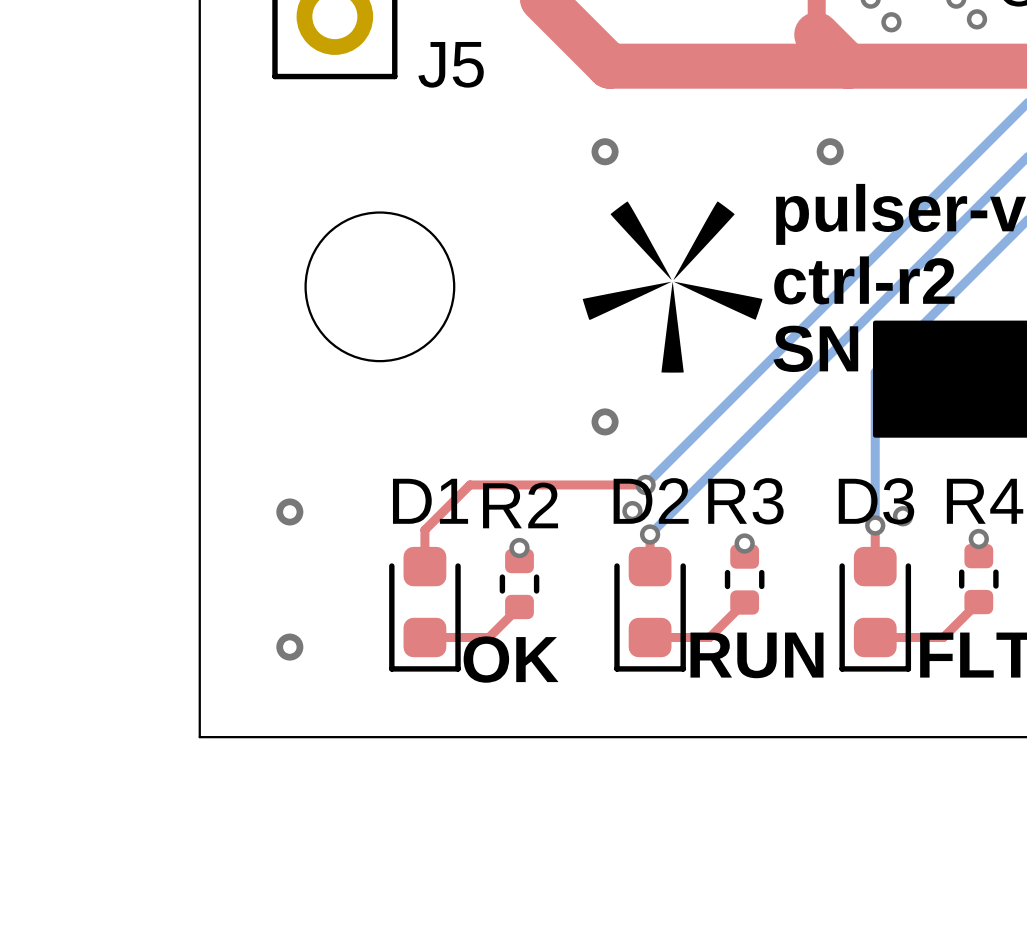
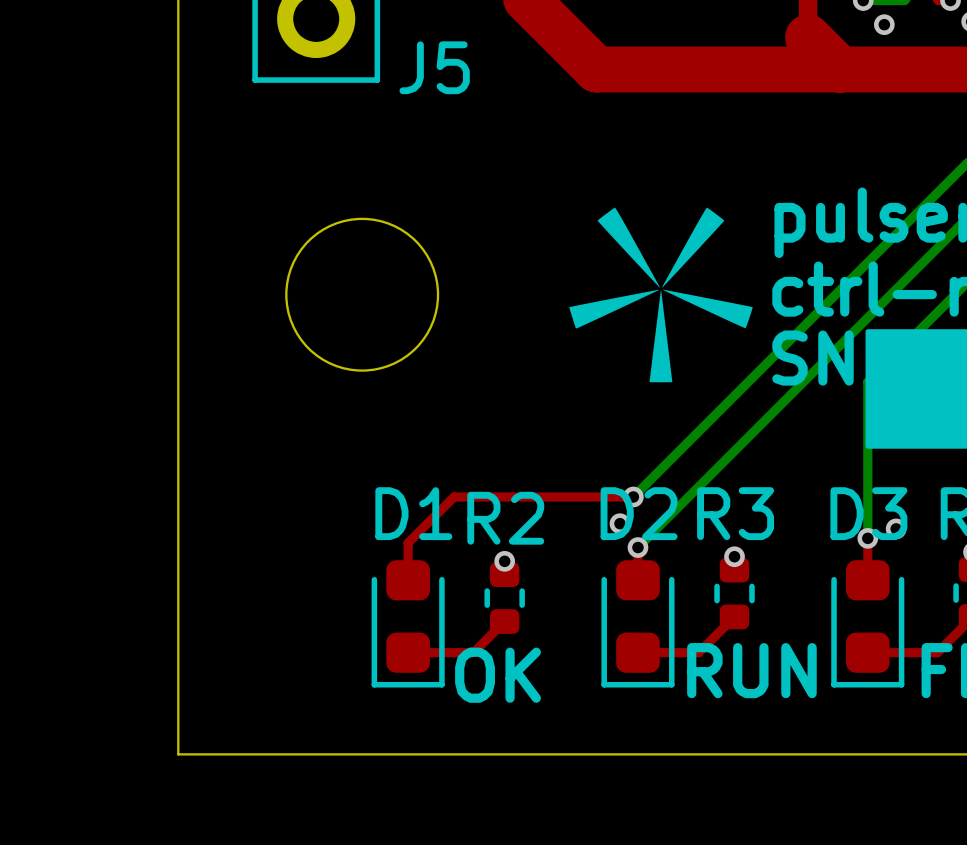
via: (605, 151) -> none
via: (830, 151) -> none
via: (605, 421) -> none
via: (289, 511) -> none
via: (289, 647) -> none

